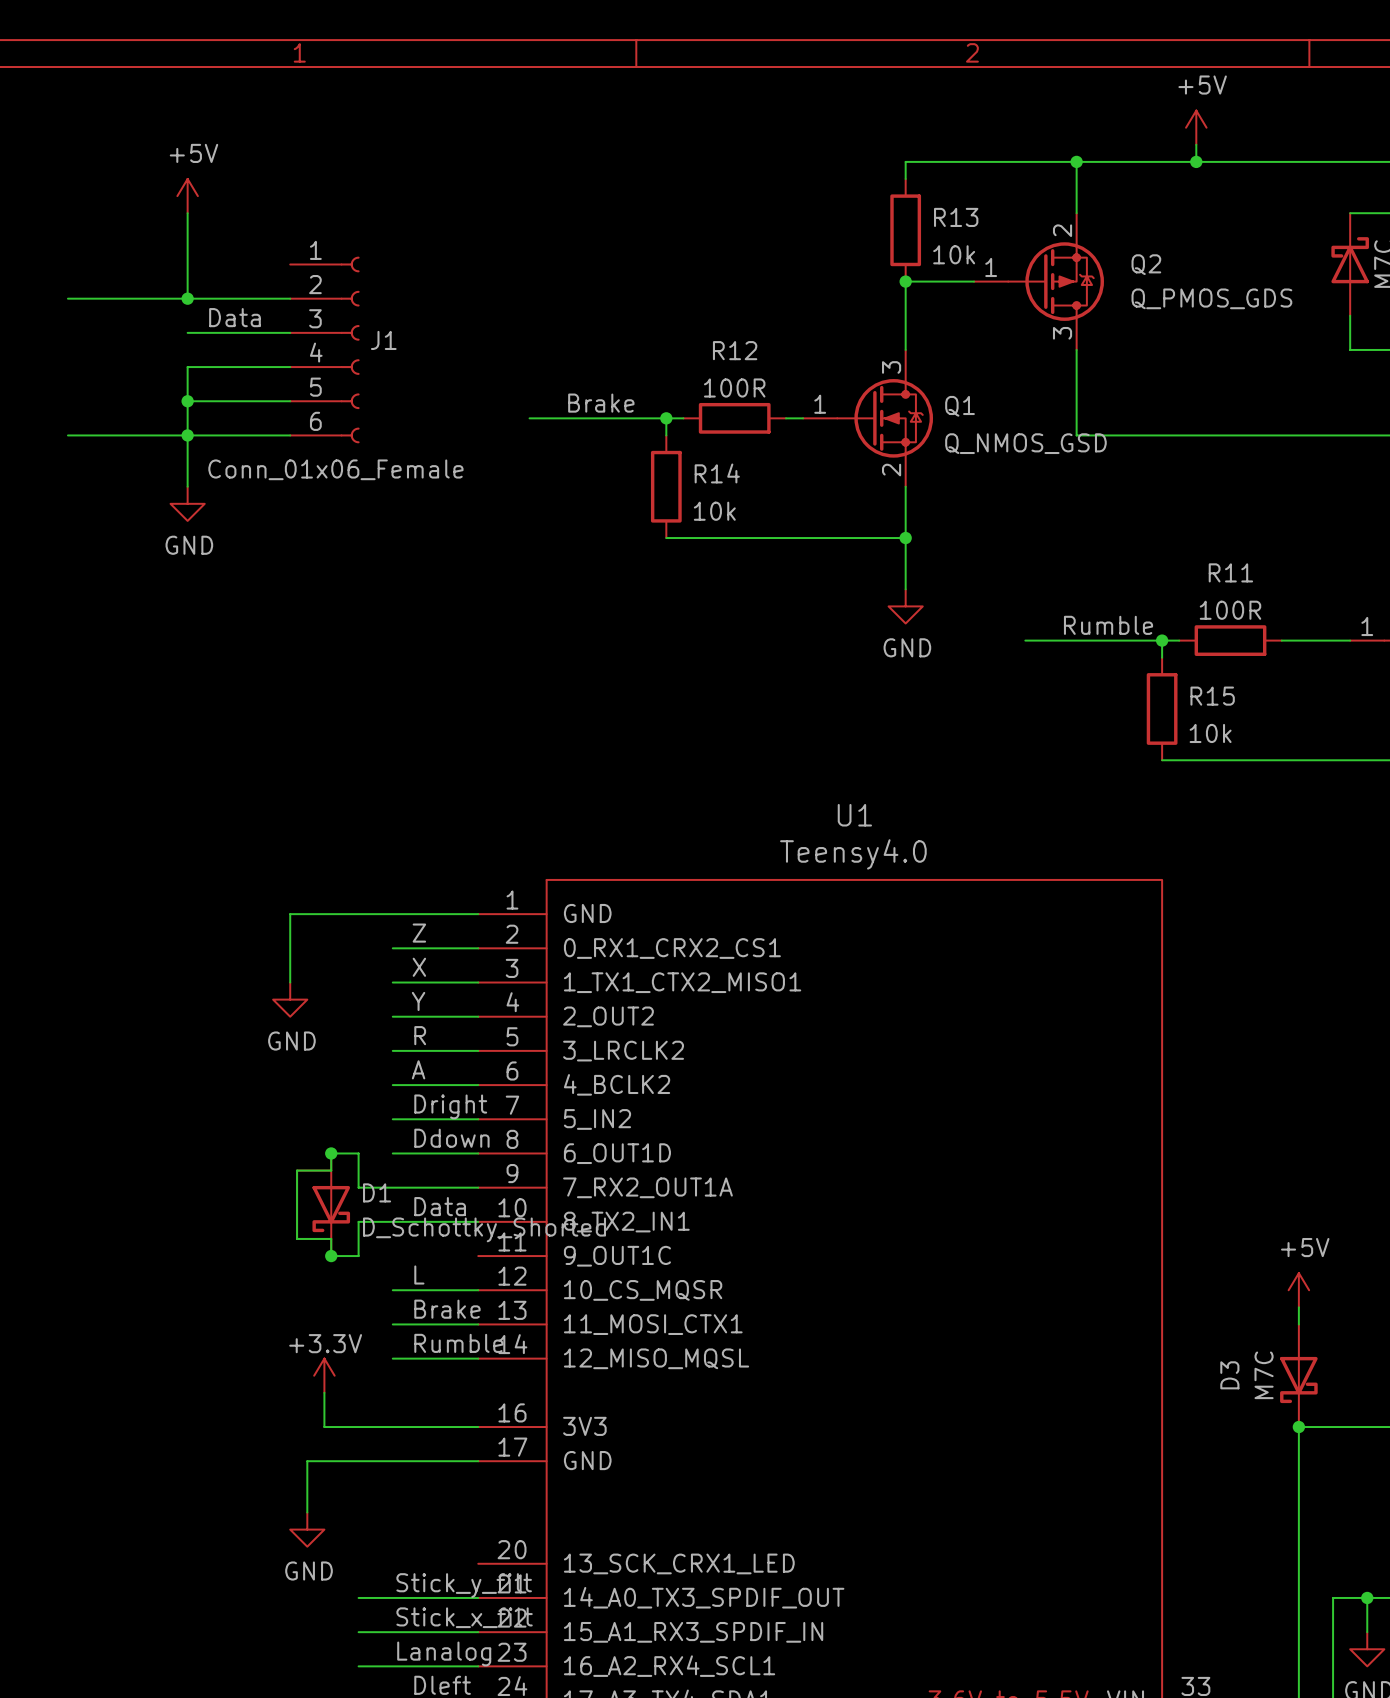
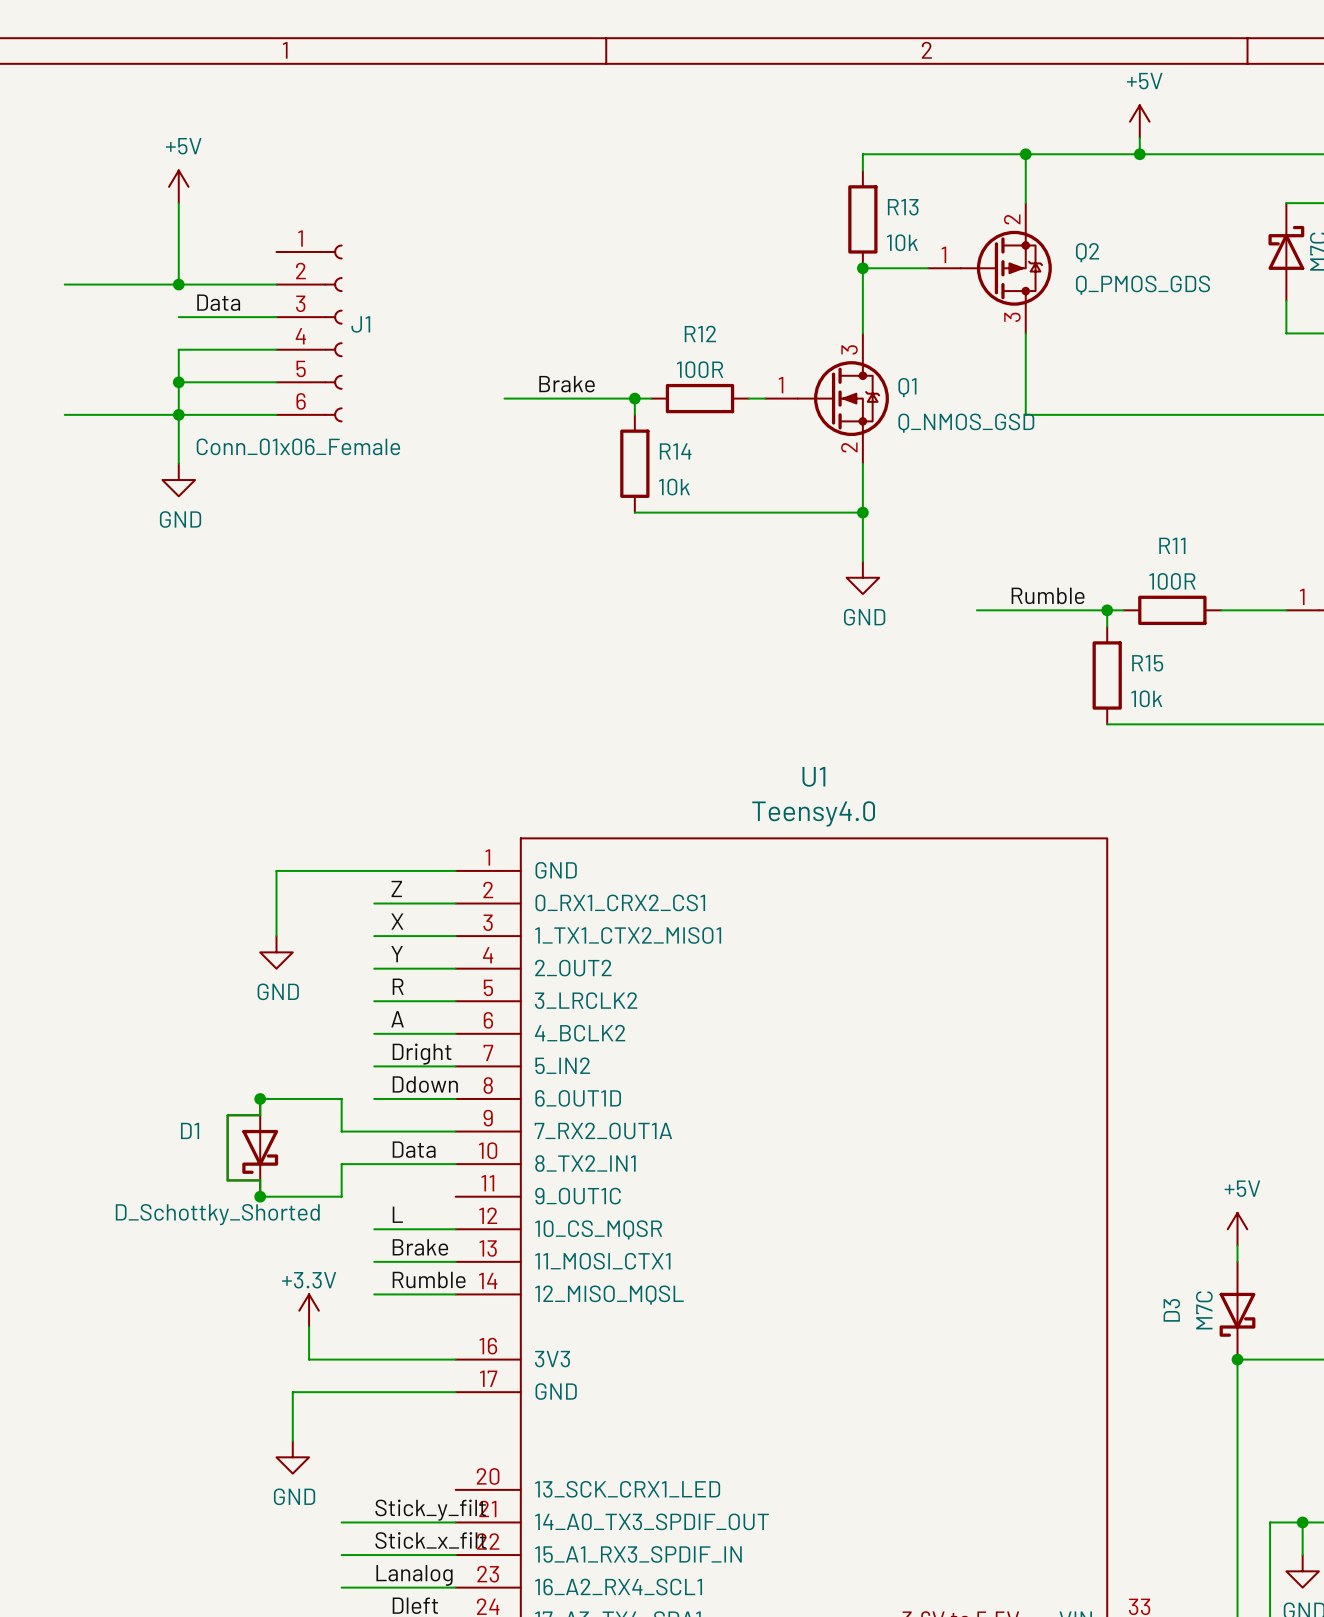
wire: (331, 1153) (331, 1170) (297, 1170) (297, 1238) (331, 1238) (331, 1256) -> (315, 1098) (260, 1098) (260, 1115) (227, 1115) (227, 1180) (260, 1180) (260, 1196) (315, 1196)
junction position: (331, 1153) -> (260, 1098)
D1 name position: D1 (377, 1192) -> D1 (190, 1130)
D1 position: (323, 1204) -> (252, 1147)
D1 value position: D_Schottky_Shorted (484, 1229) -> D_Schottky_Shorted (217, 1214)
junction position: (331, 1256) -> (260, 1196)

